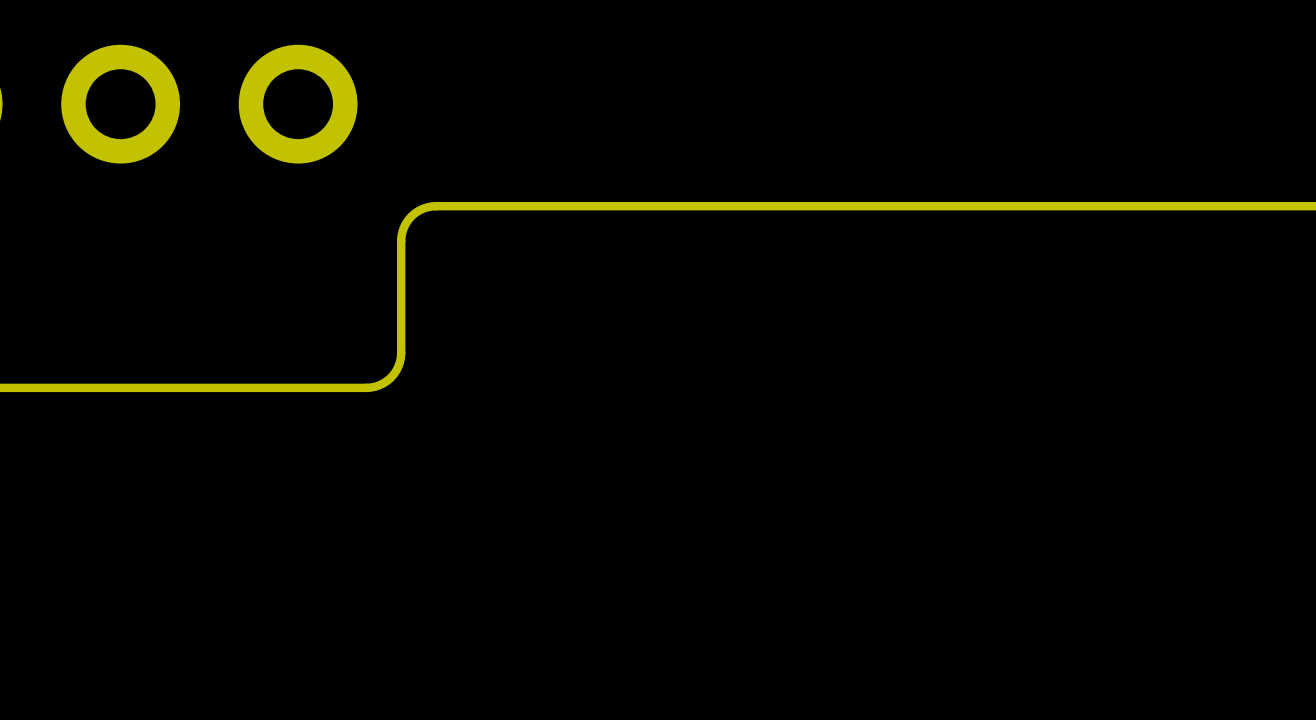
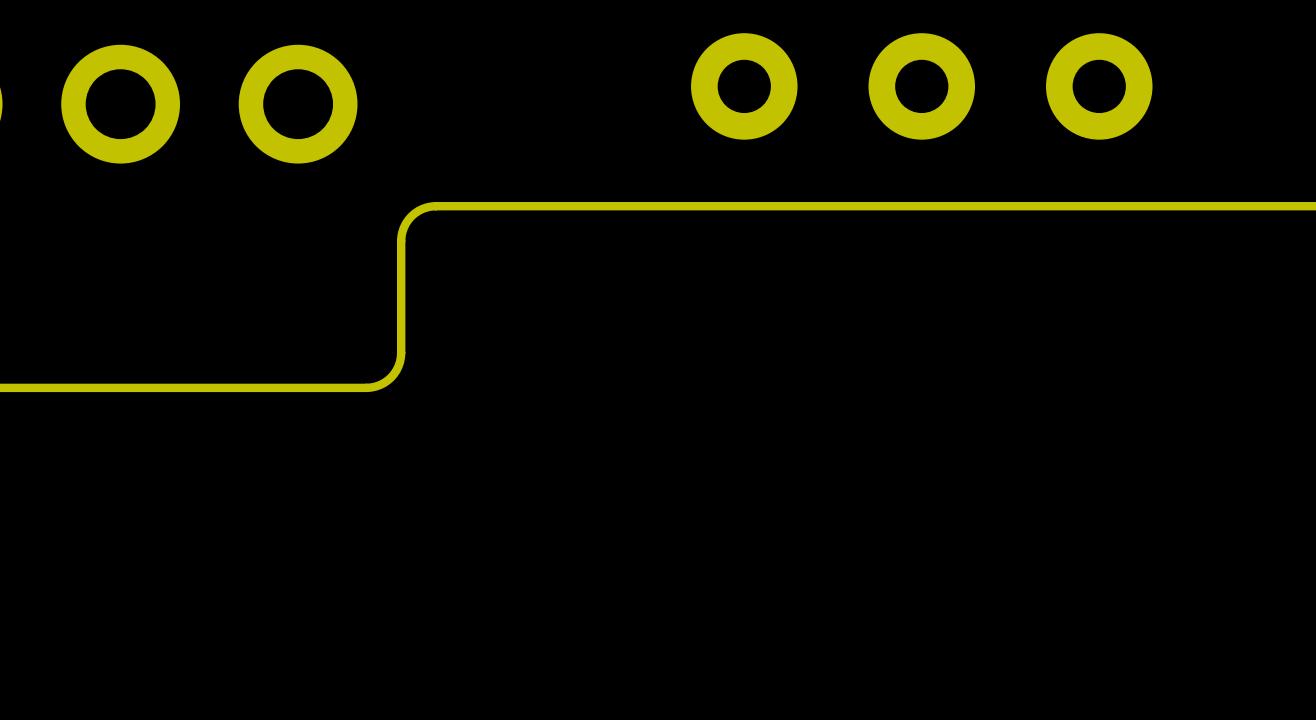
part: none -> (921, 86)

